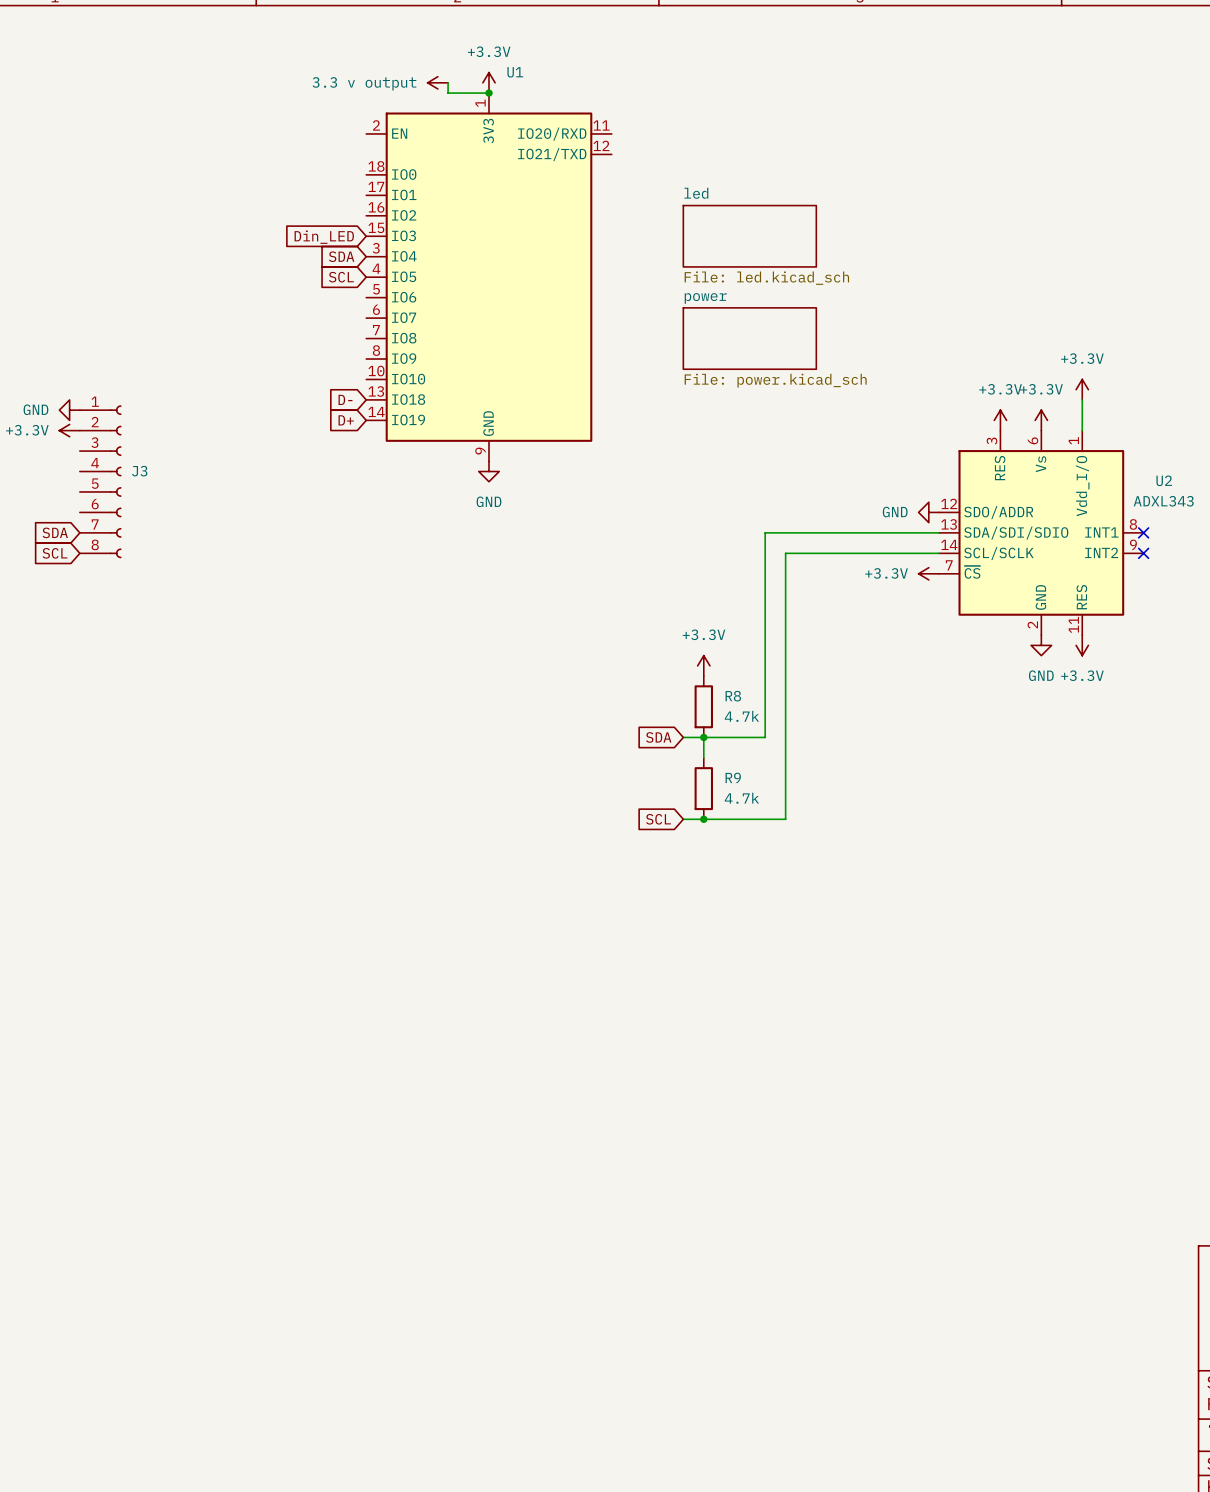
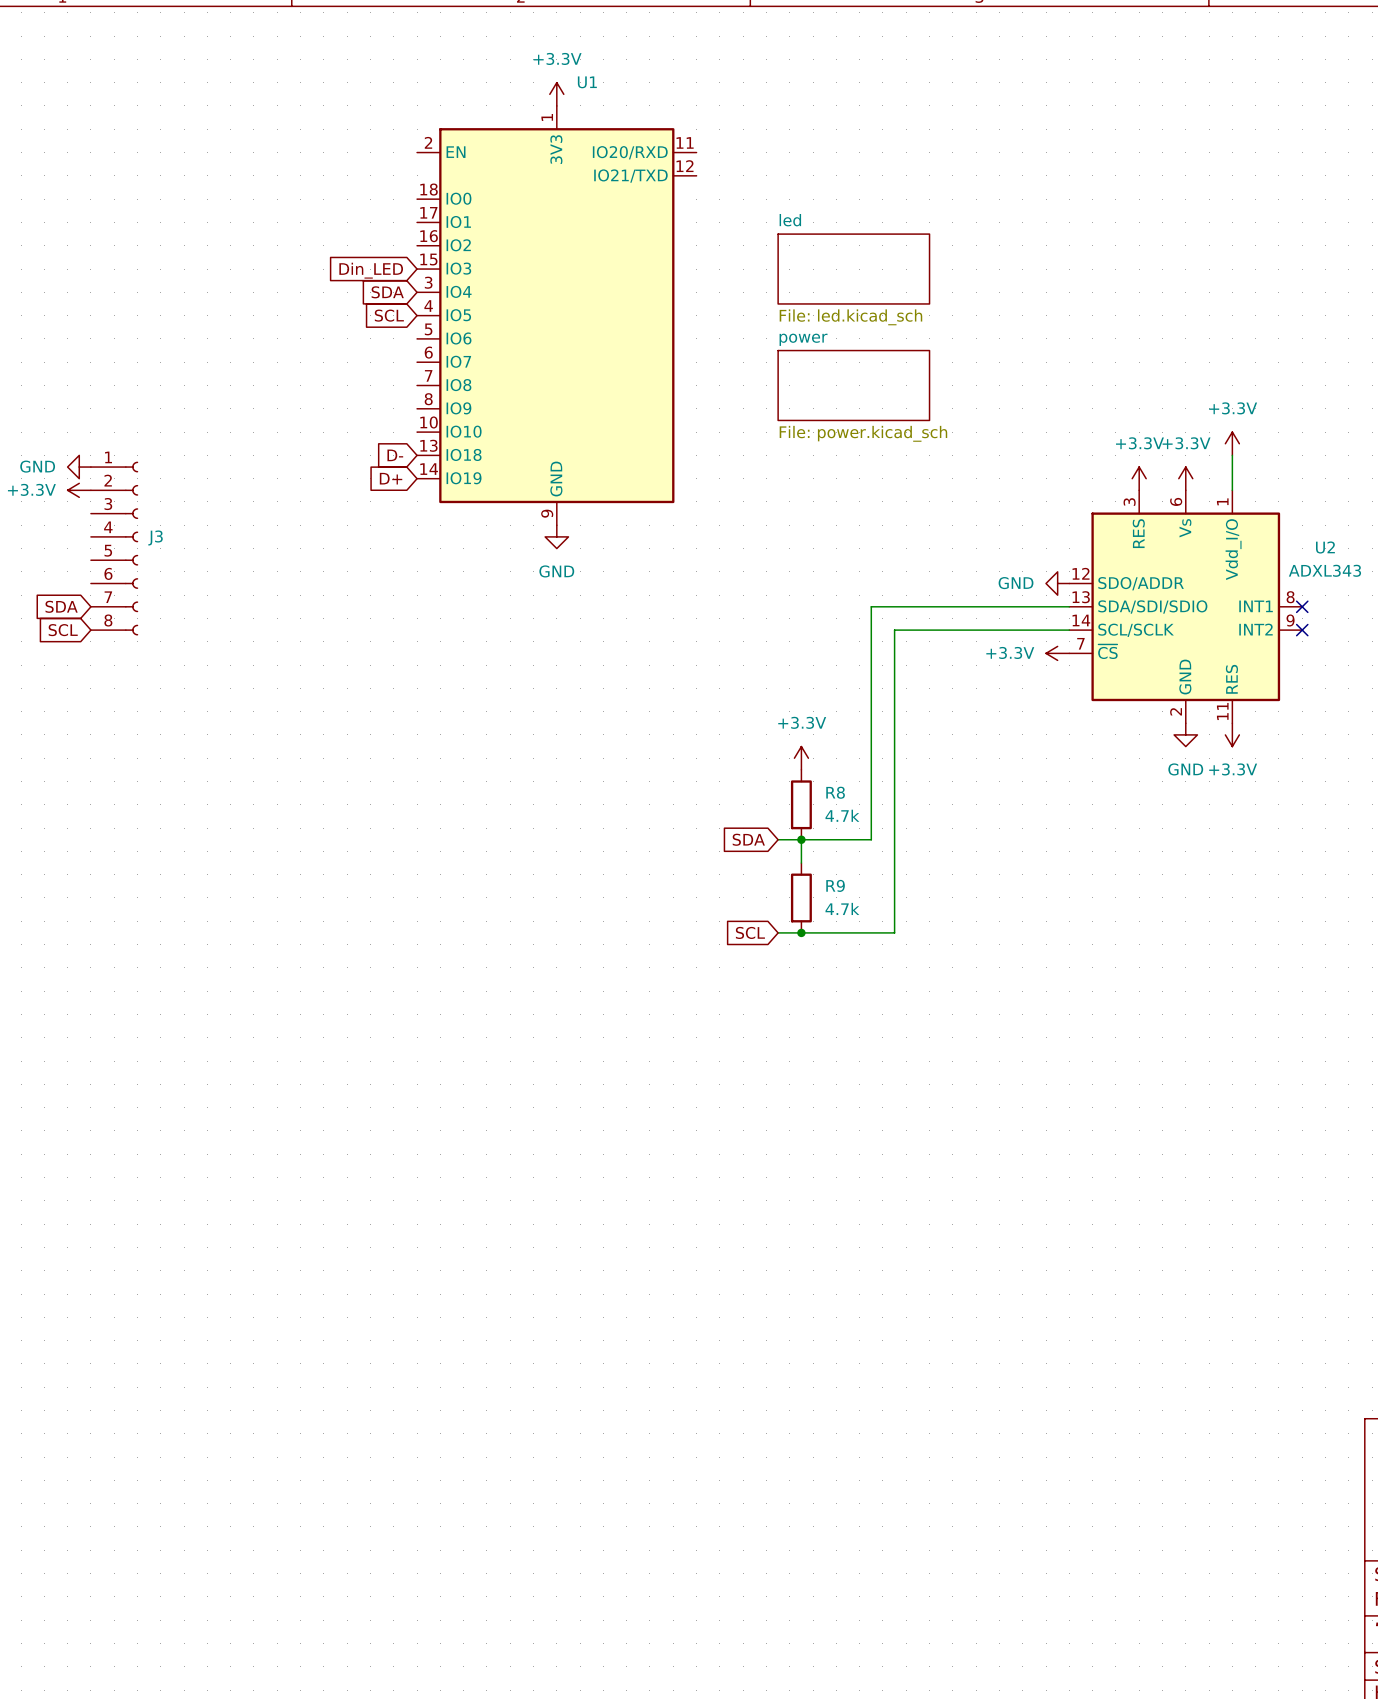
power symbol: 3.3 v output (437, 82) -> none
wire: (448, 82) (448, 93) (488, 93) -> none
junction: (488, 93) -> none

